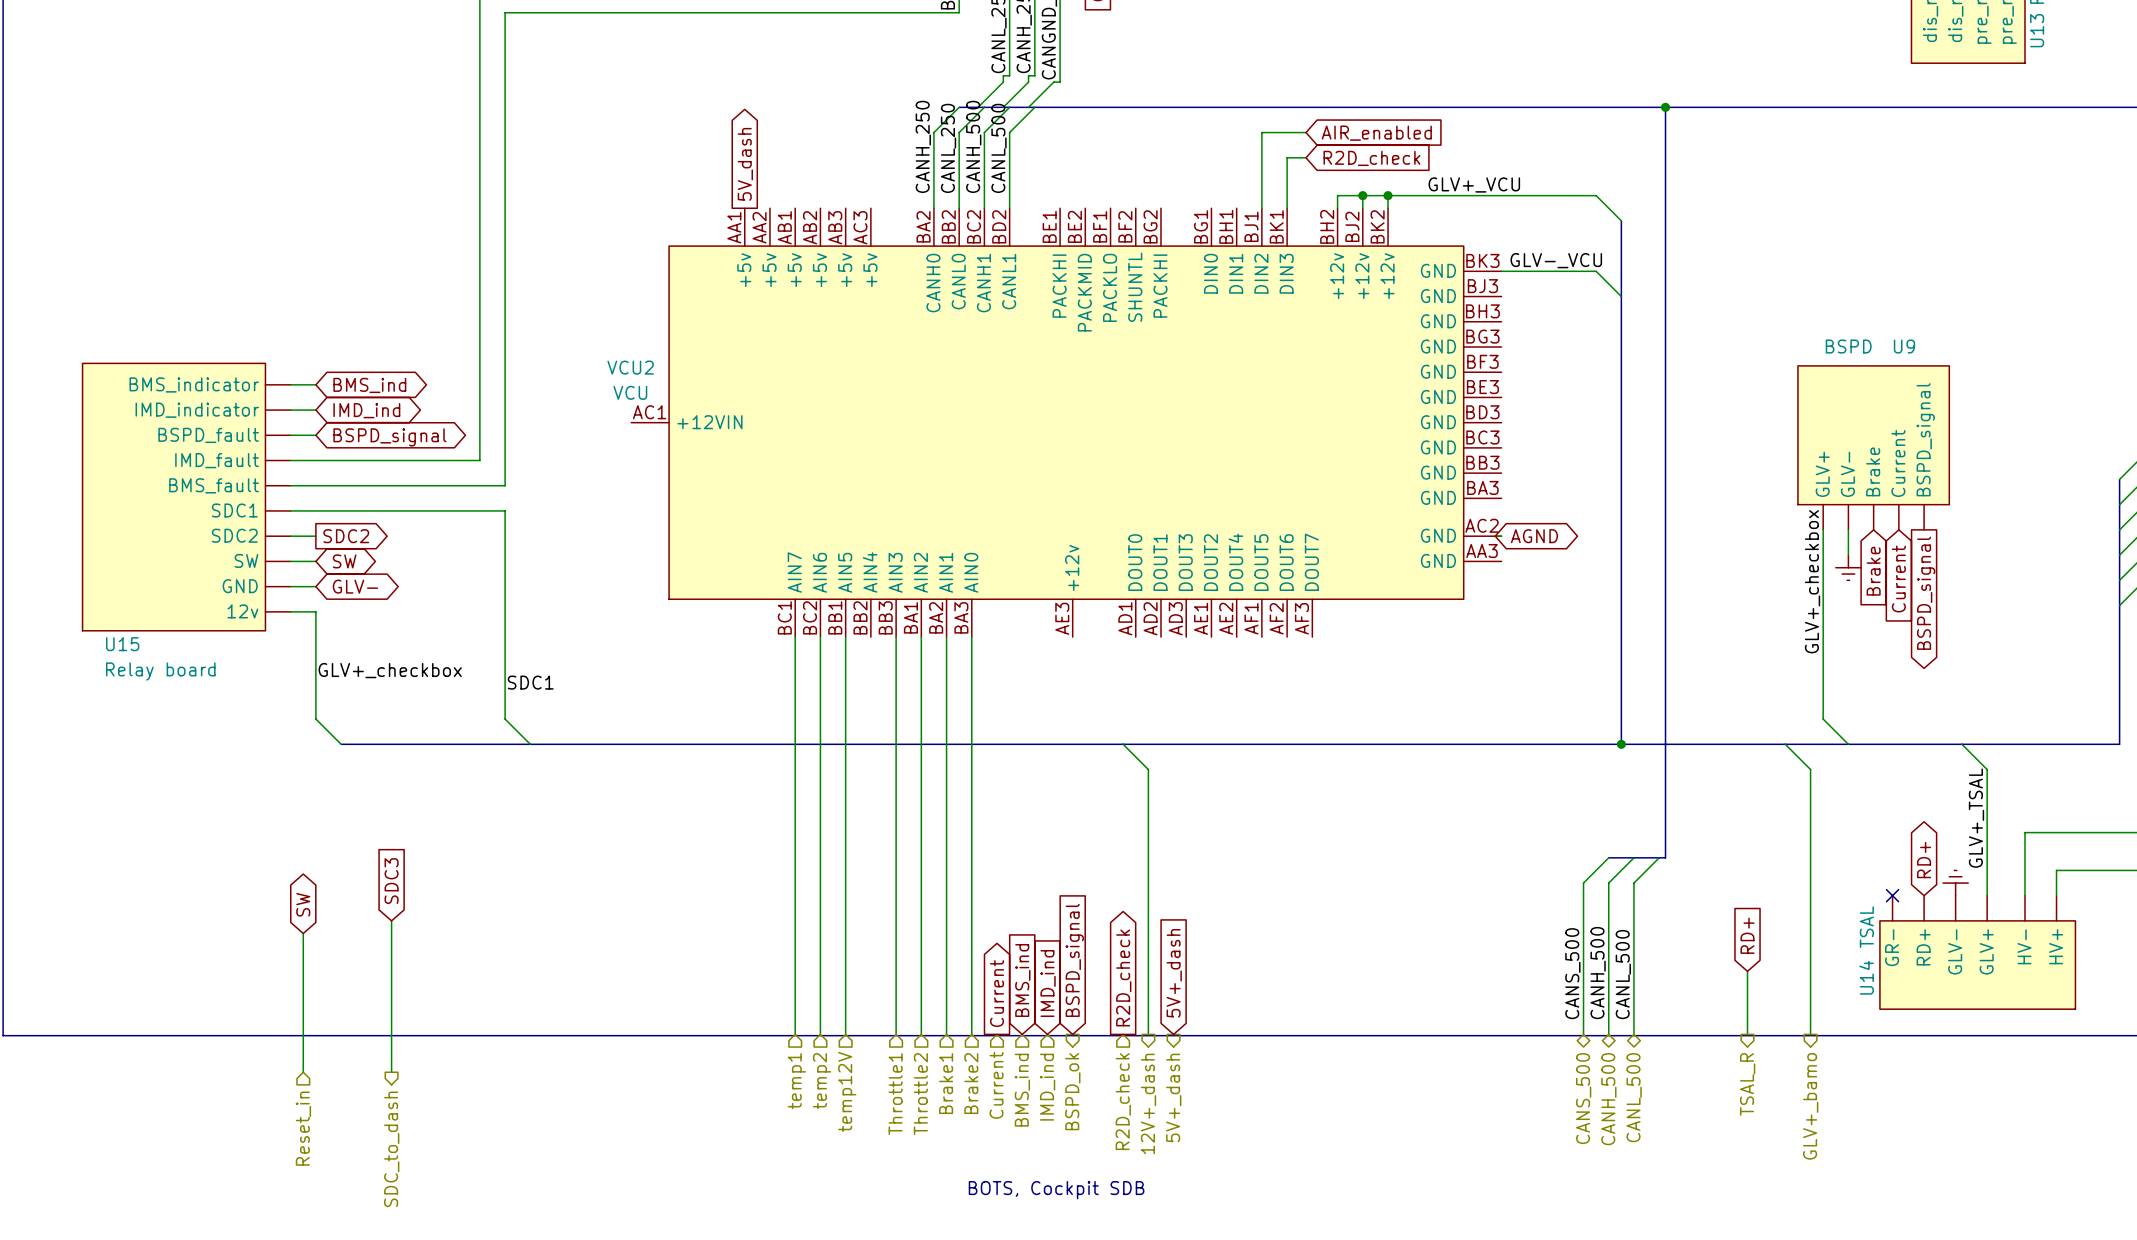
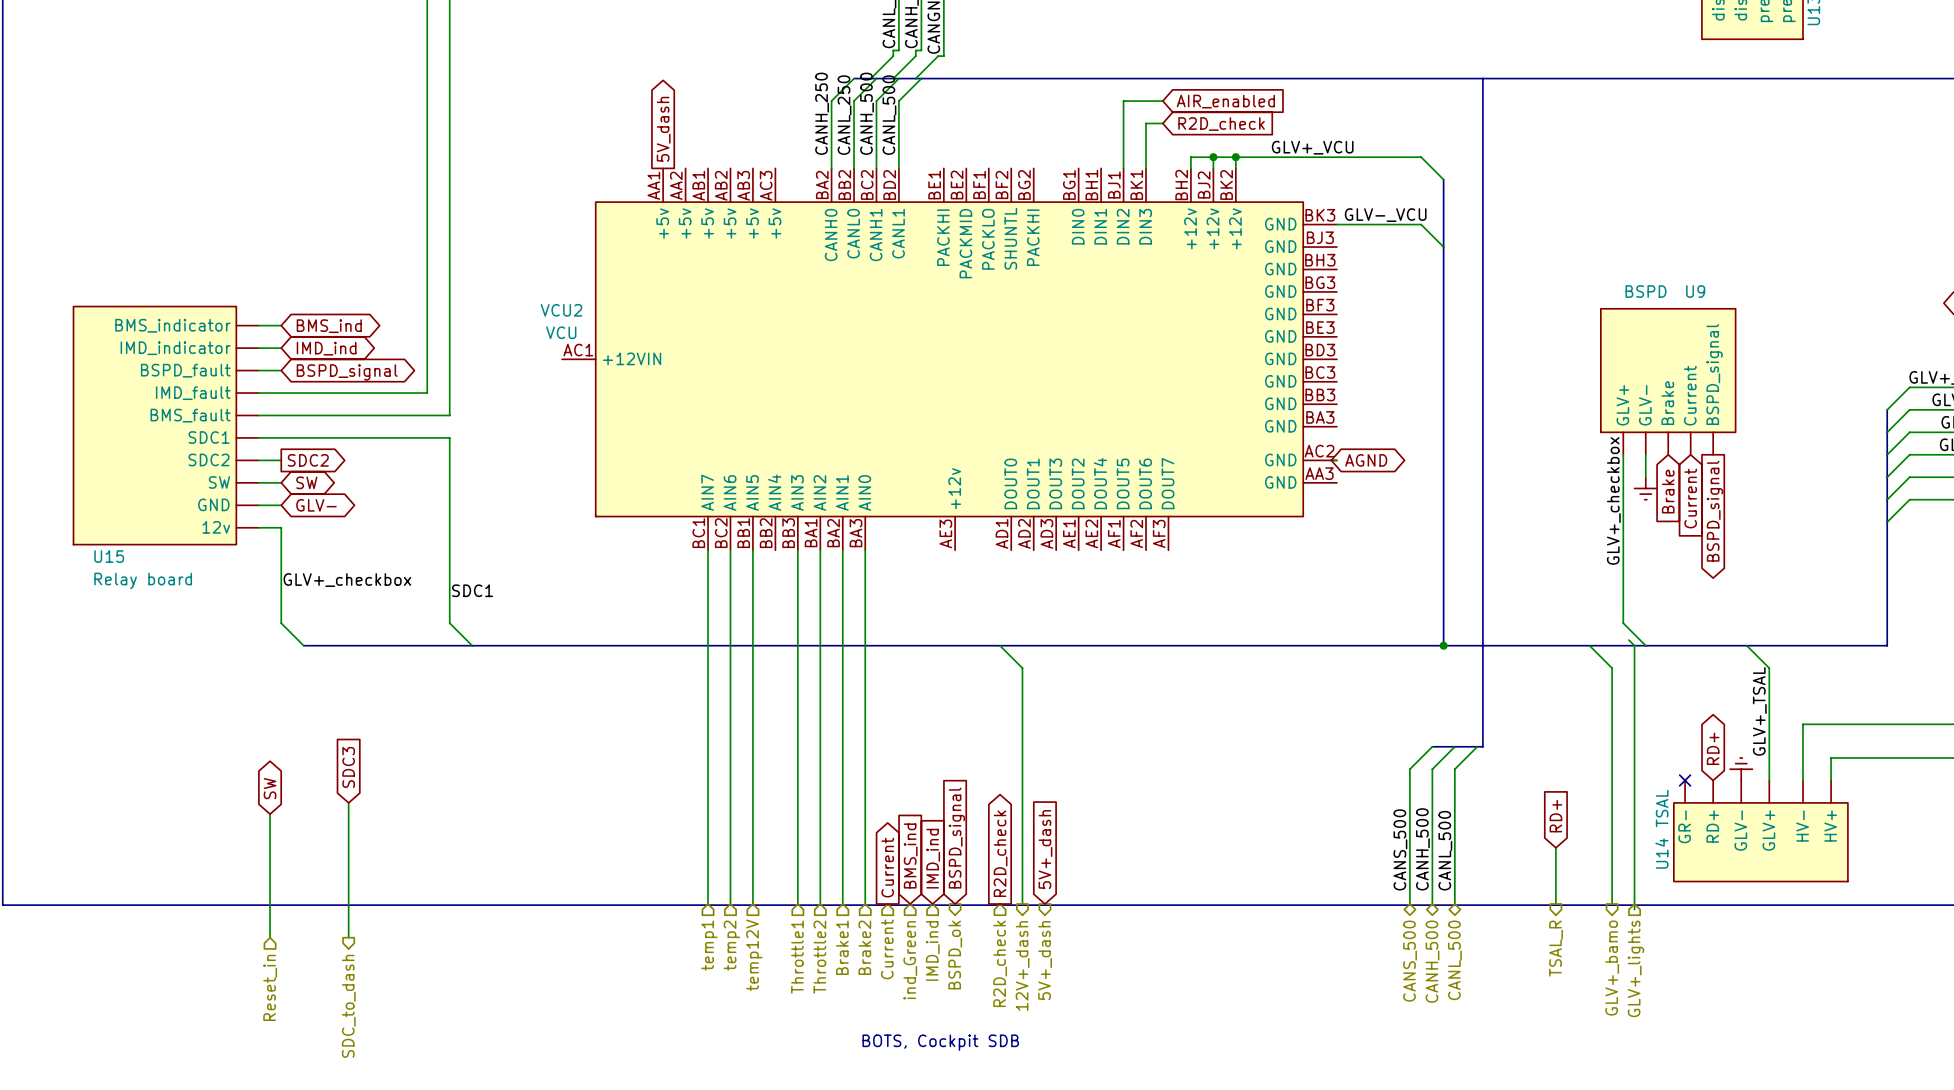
junction: (1665, 107) -> none
wire: none -> (1628, 640) (1634, 645) (1634, 909)
hierarchical label: BMS_ind (1022, 1090) -> ind_Green (910, 960)
hierarchical label: none -> GLV+_lights (1635, 968)

